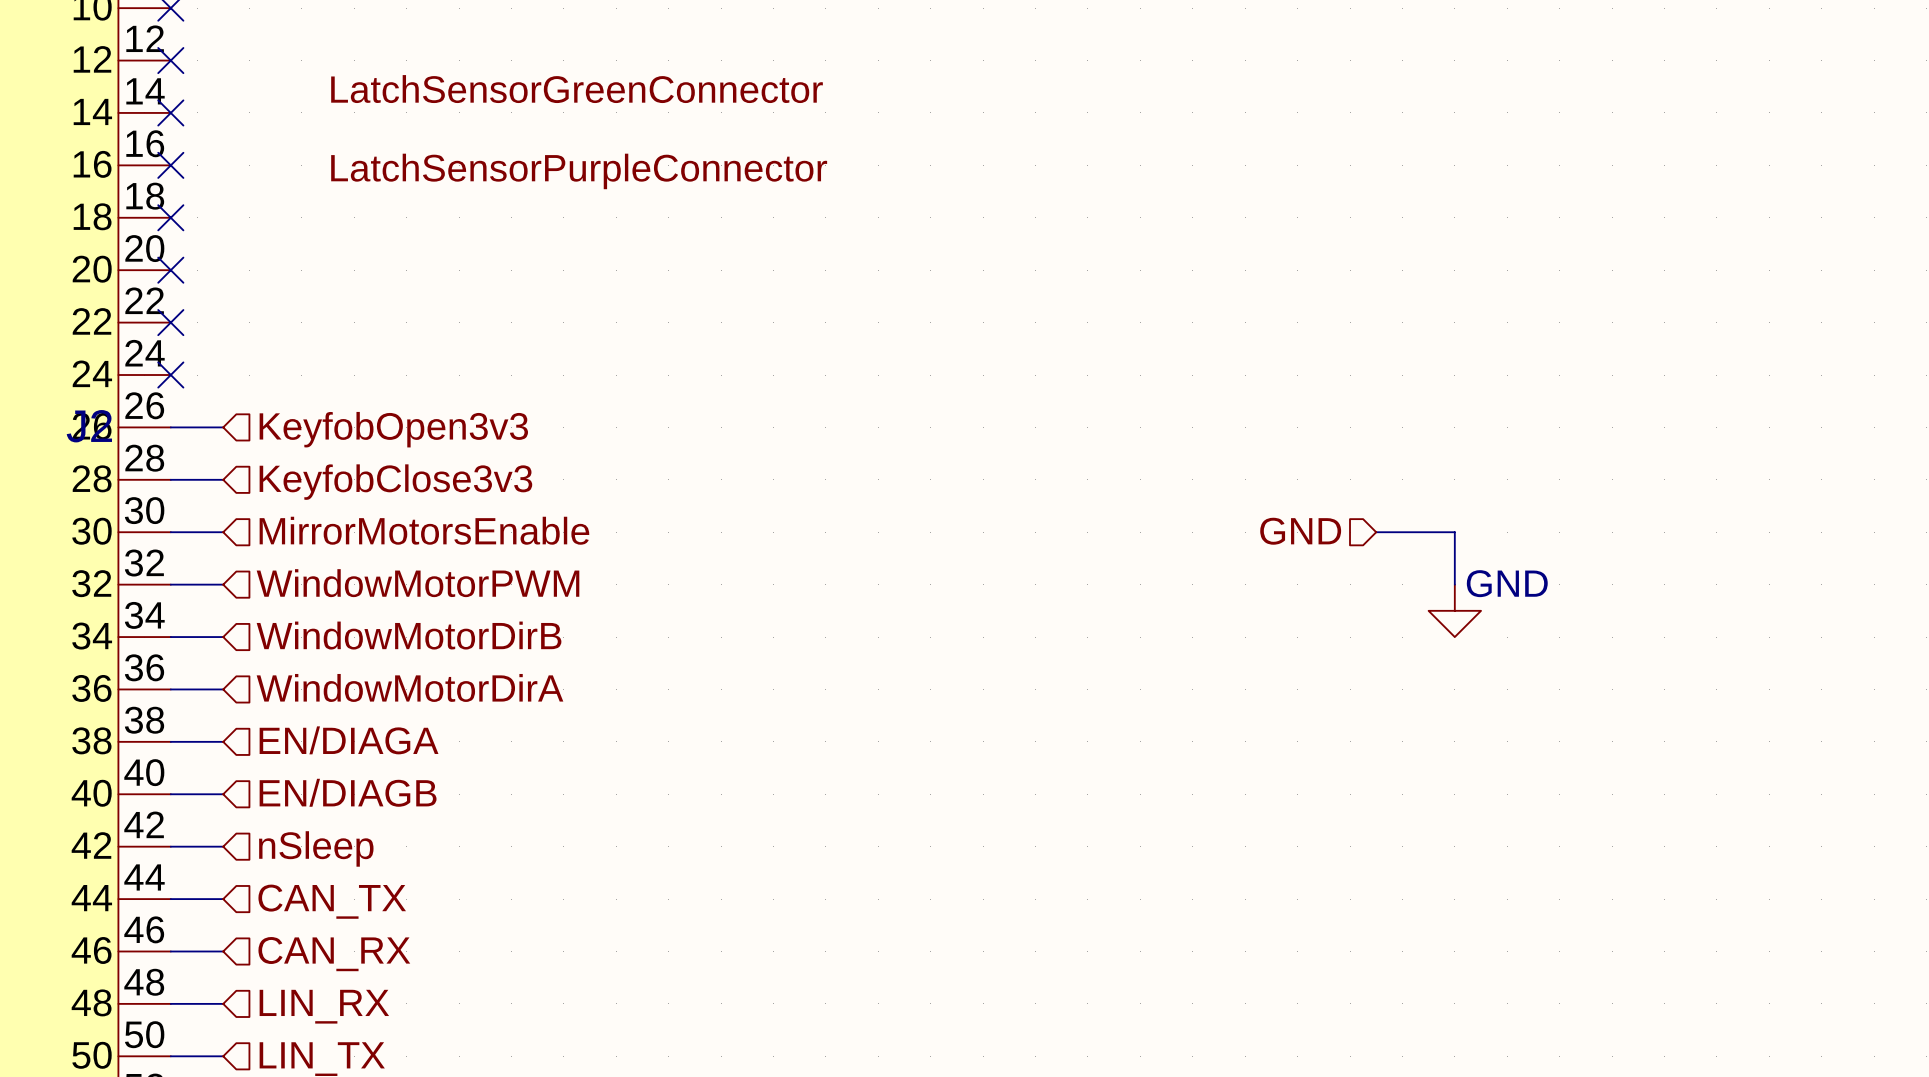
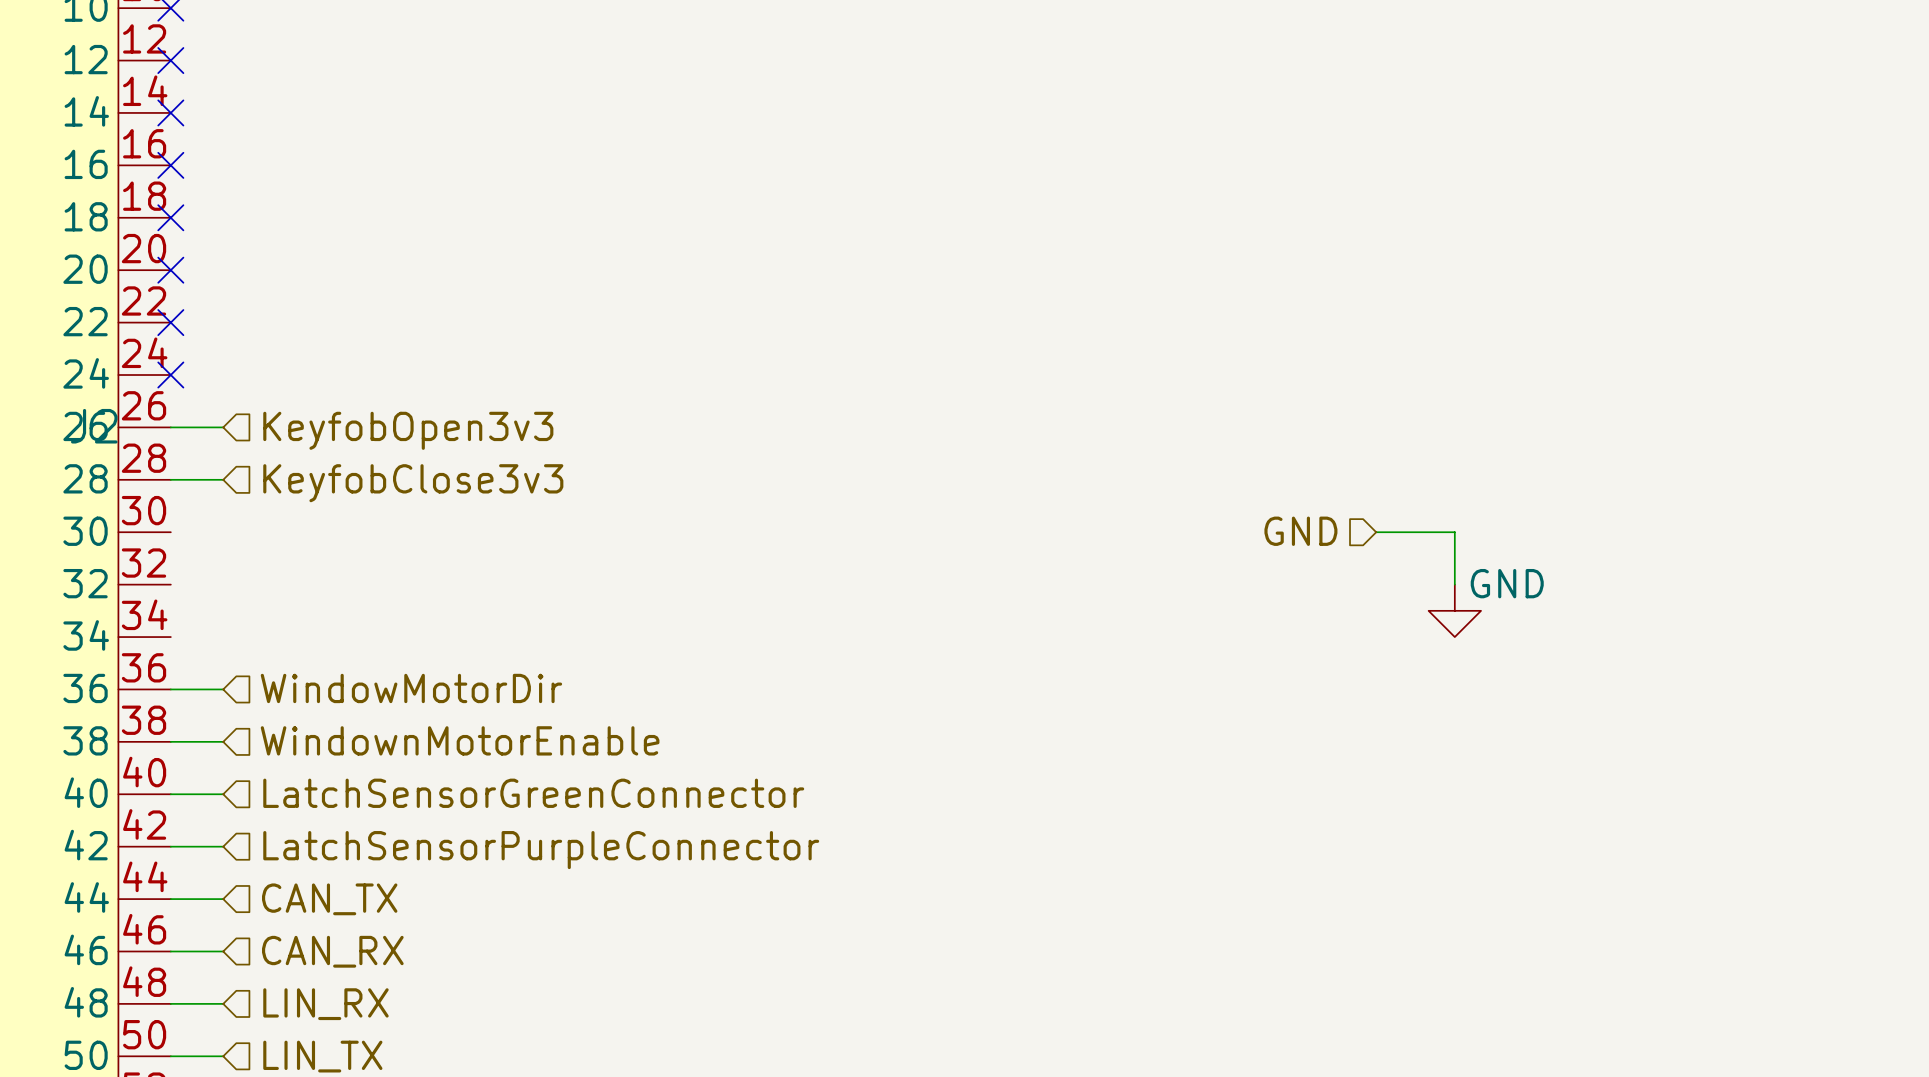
label: LatchSensorGreenConnector (577, 89) -> none
label: LatchSensorPurpleConnector (579, 171) -> none
hierarchical label: MirrorMotorsEnable (424, 530) -> none
wire: (170, 532) (223, 532) -> none
hierarchical label: WindowMotorPWM (417, 583) -> none
wire: (170, 584) (223, 584) -> none
hierarchical label: WindowMotorDirB (409, 635) -> none
wire: (170, 637) (223, 637) -> none
hierarchical label: WindowMotorDirA (410, 687) -> WindowMotorDir (411, 688)
hierarchical label: EN/DIAGA (349, 740) -> WindownMotorEnable (460, 740)
hierarchical label: EN/DIAGB (348, 792) -> LatchSensorGreenConnector (533, 793)
hierarchical label: nSleep (316, 848) -> LatchSensorPurpleConnector (541, 850)

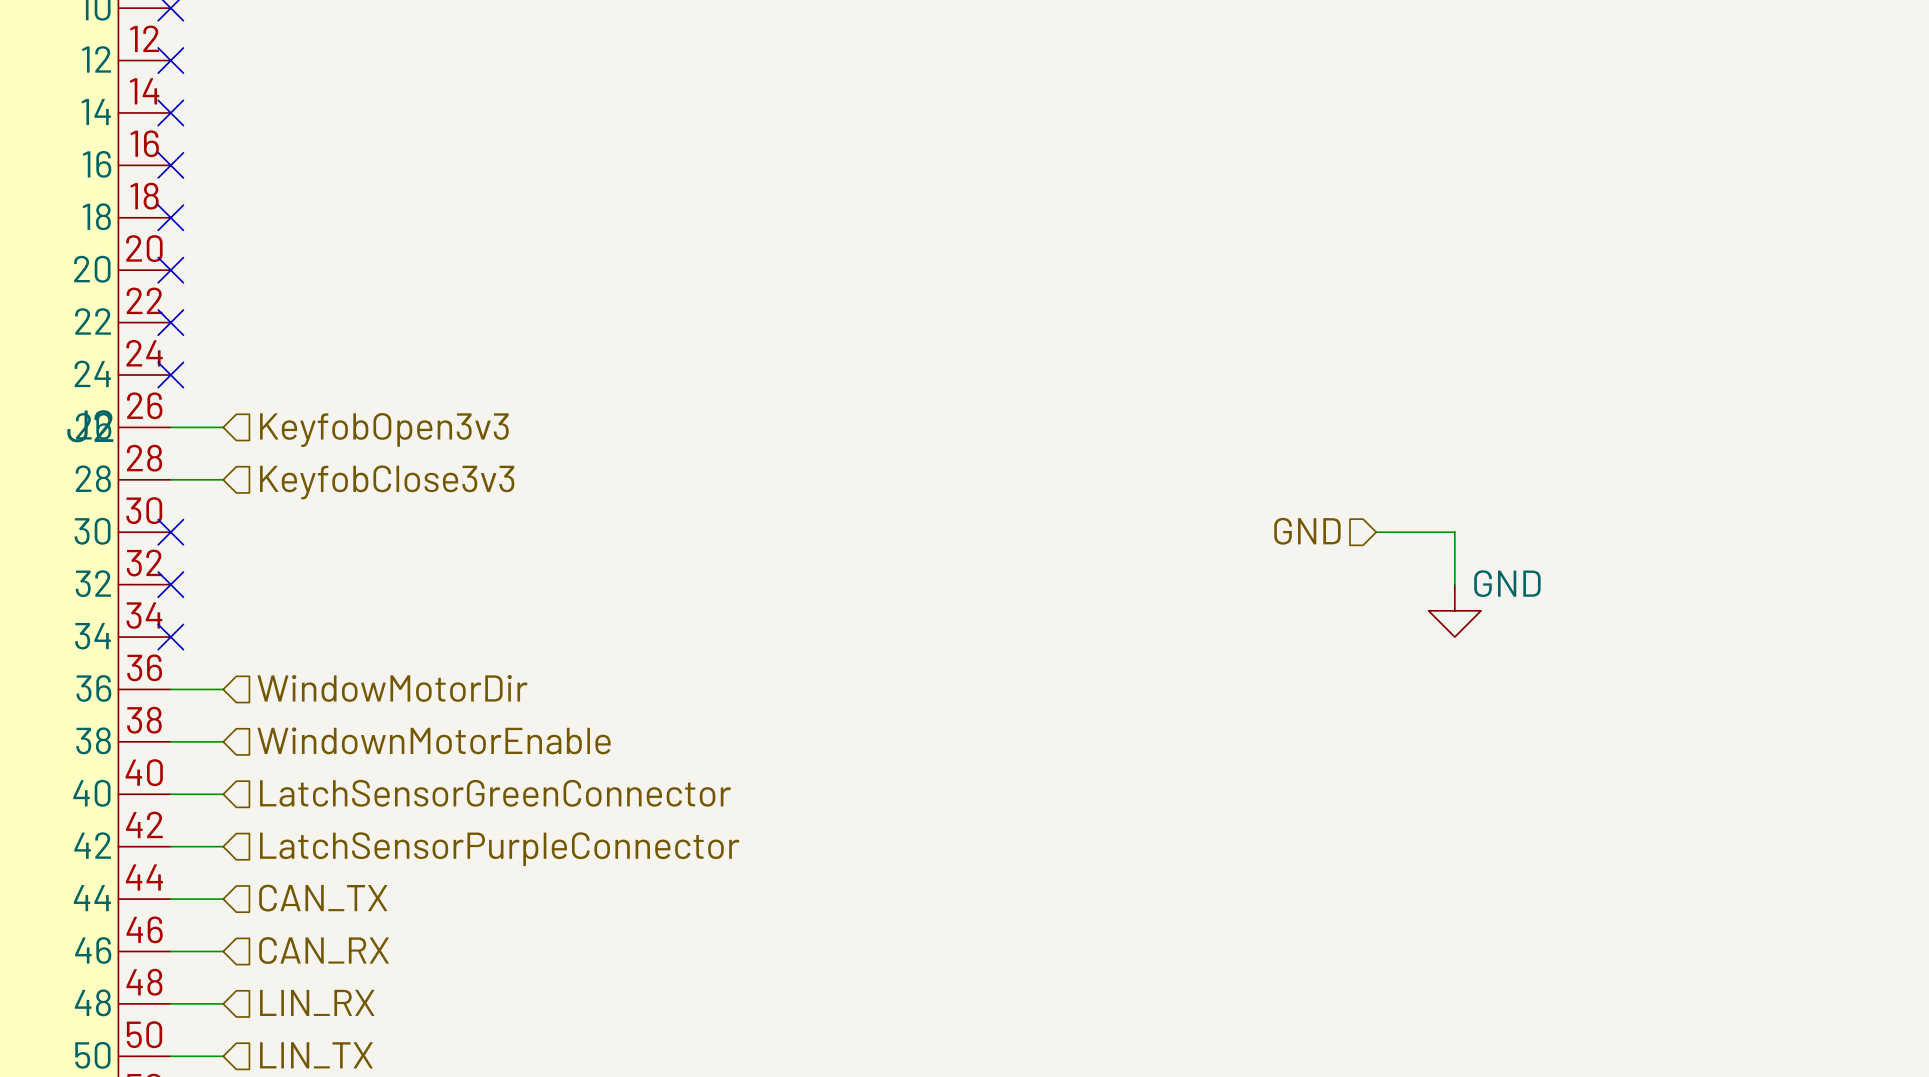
no-connect mark: none -> (170, 532)
no-connect mark: none -> (170, 584)
no-connect mark: none -> (170, 637)

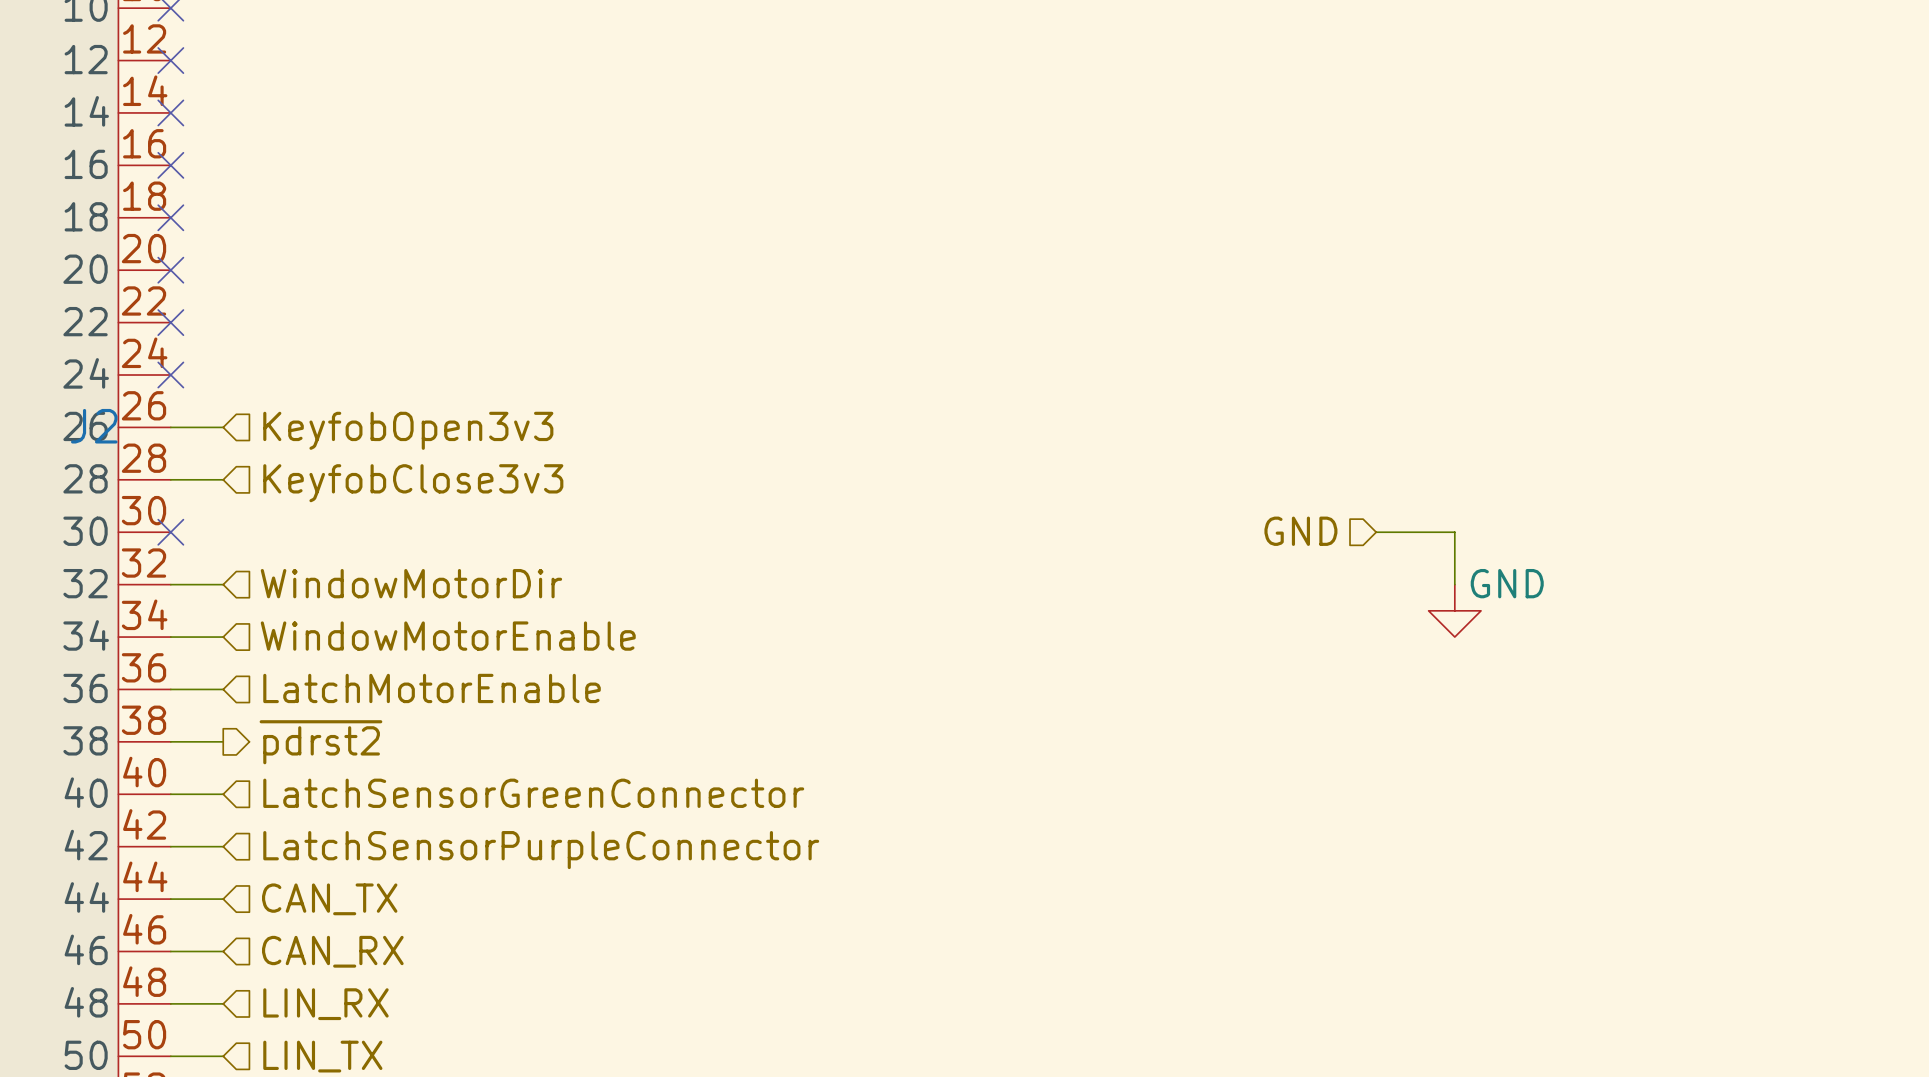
hierarchical label: none -> WindowMotorDir (411, 583)
wire: none -> (170, 584) (223, 584)
no-connect mark: (170, 584) -> none
hierarchical label: none -> WindowMotorEnable (448, 636)
wire: none -> (170, 637) (223, 637)
no-connect mark: (170, 637) -> none
hierarchical label: WindowMotorDir (392, 688) -> LatchMotorEnable (432, 688)
hierarchical label shape: input (434, 740) -> output (320, 742)
hierarchical label: WindownMotorEnable (434, 740) -> ~{pdrst2} (320, 742)

